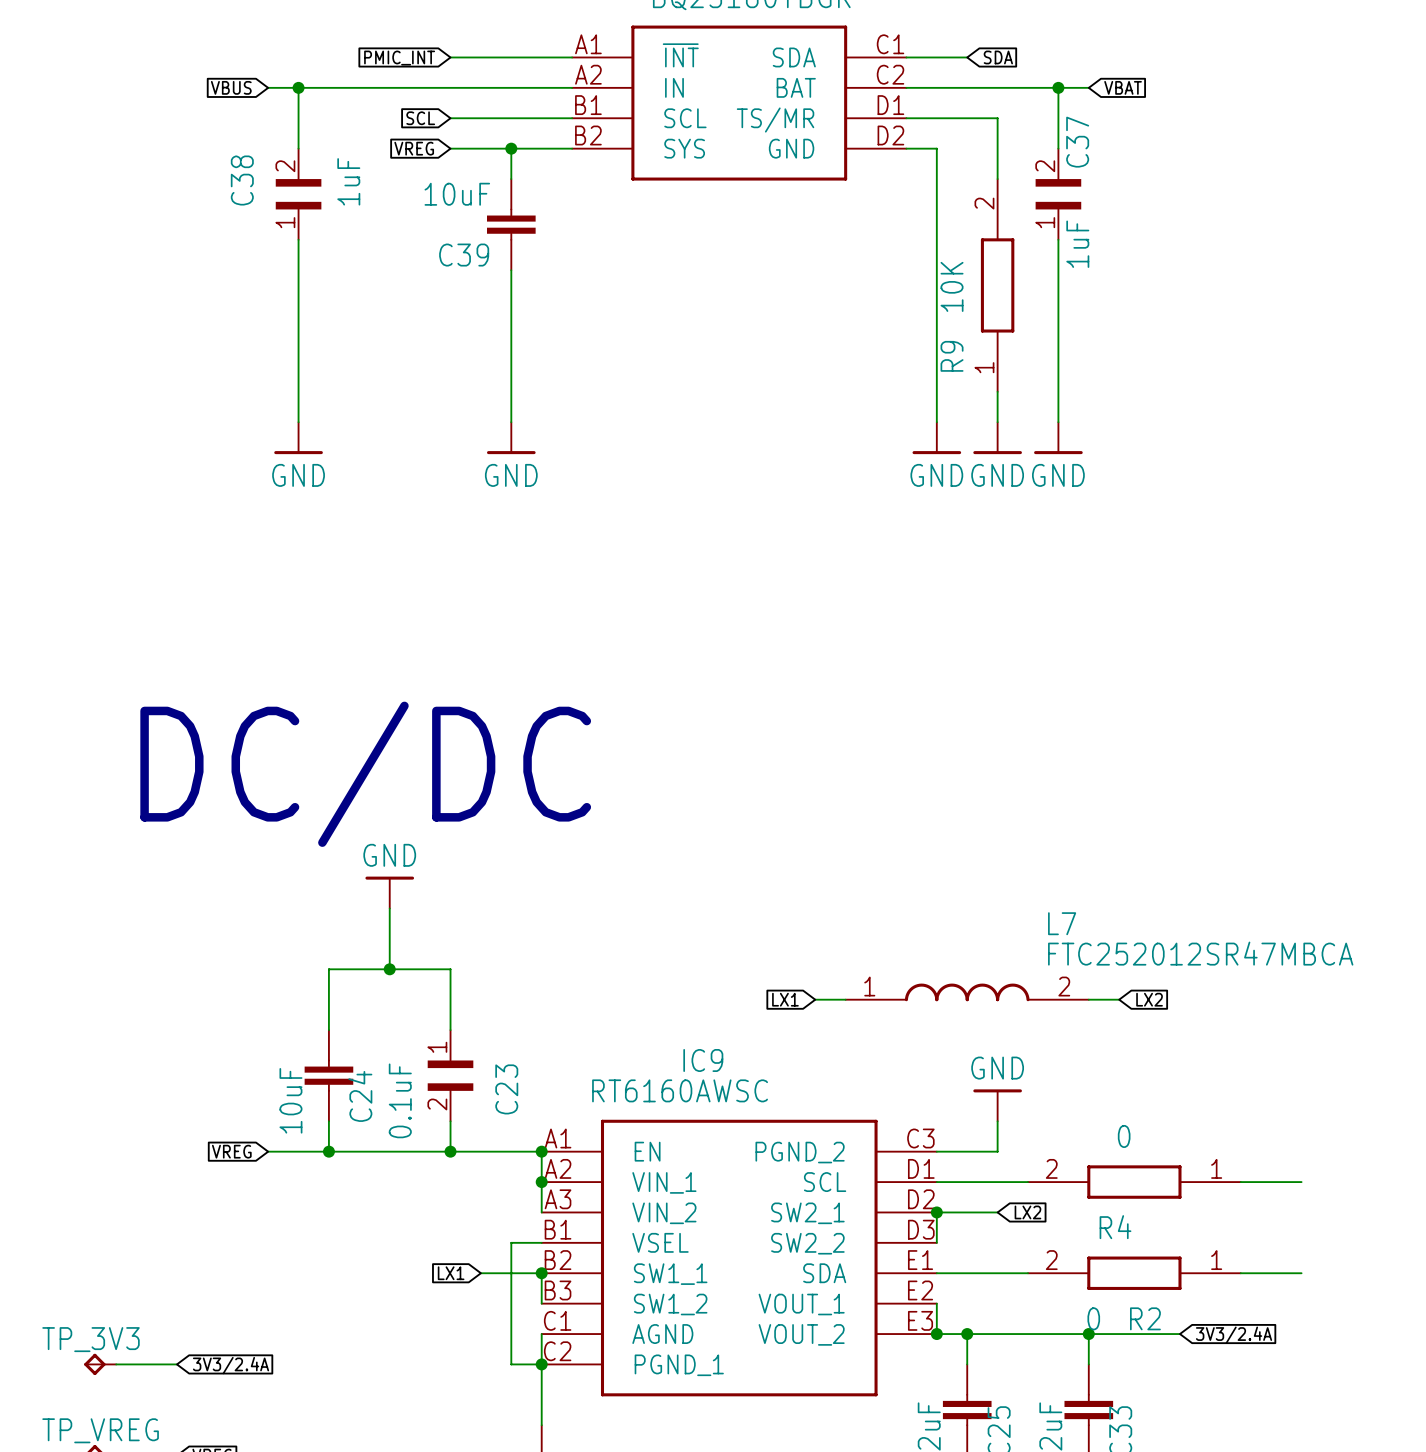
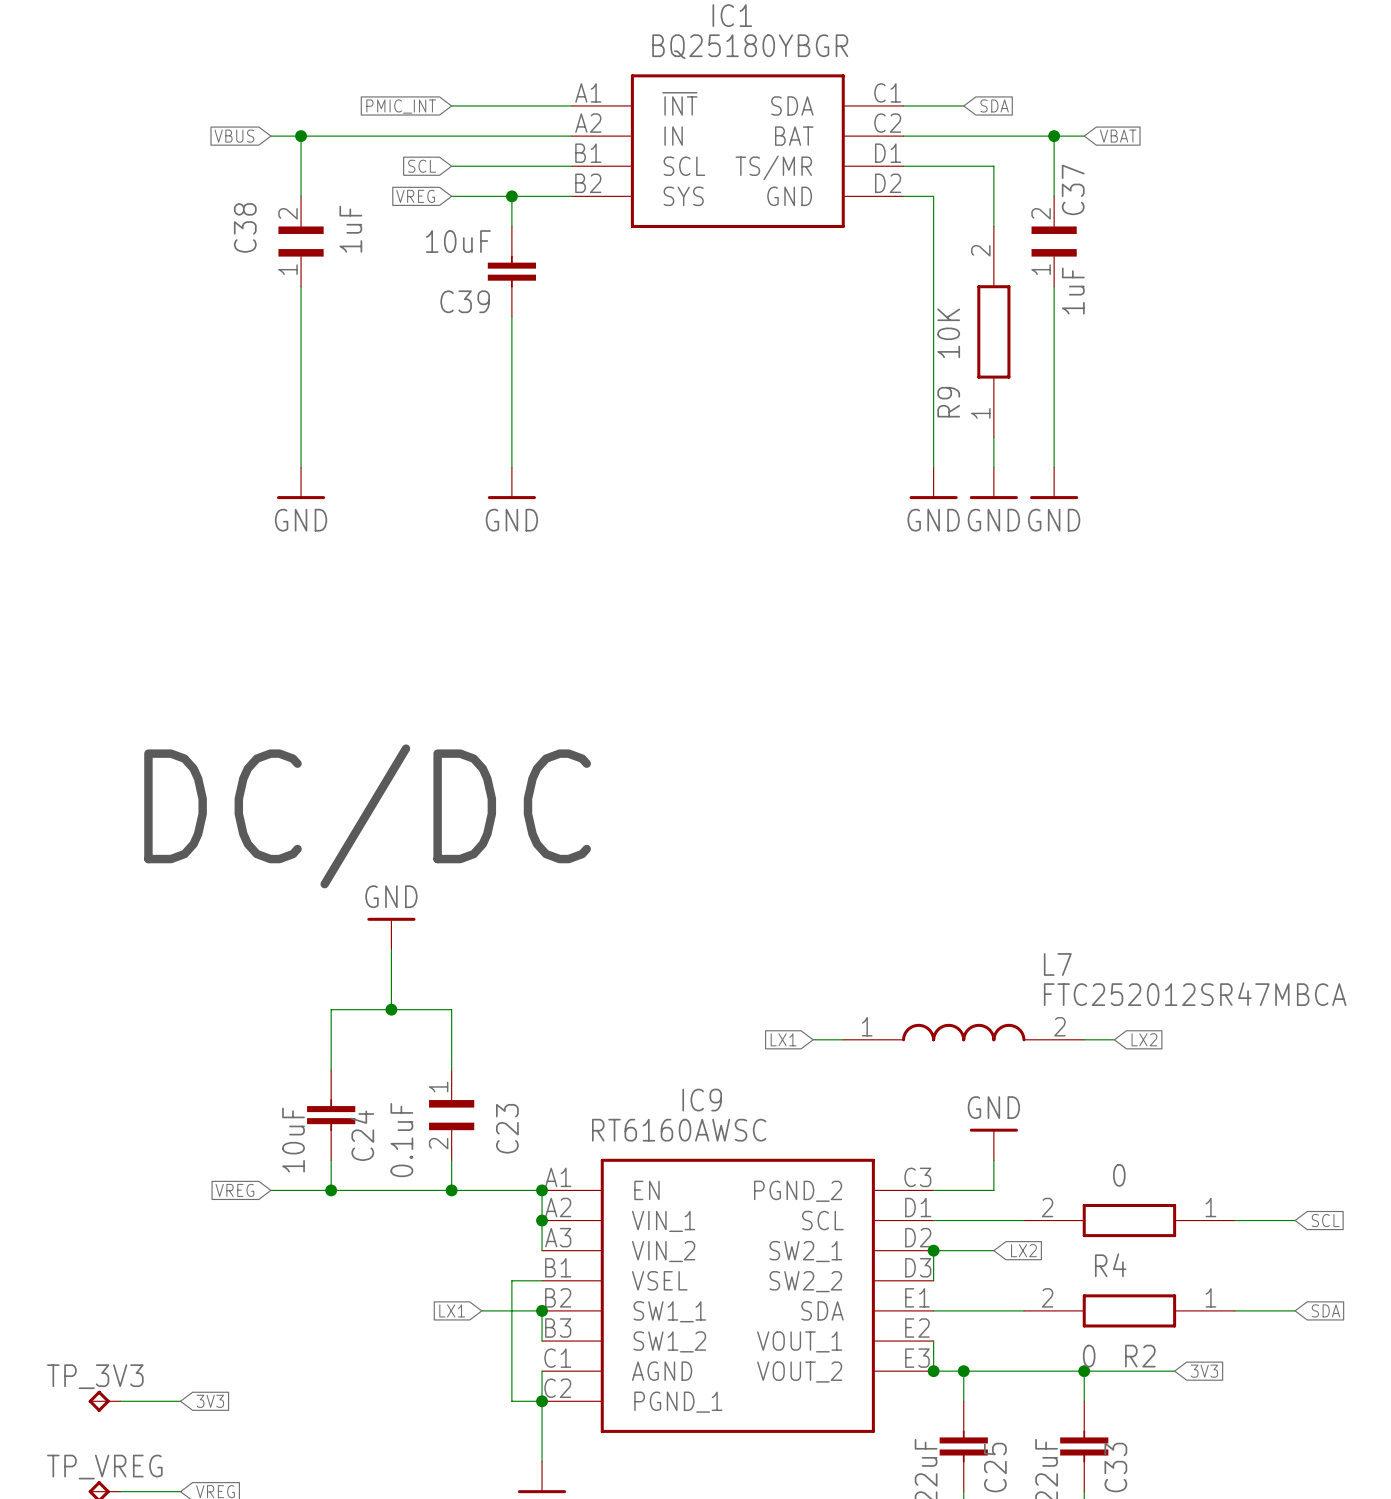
global label: none -> SCL (1325, 1220)
global label: none -> SDA (1325, 1310)
global label: 3V3/2.4A (1234, 1335) -> 3V3 (1204, 1371)
global label: 3V3/2.4A (231, 1365) -> 3V3 (210, 1401)

